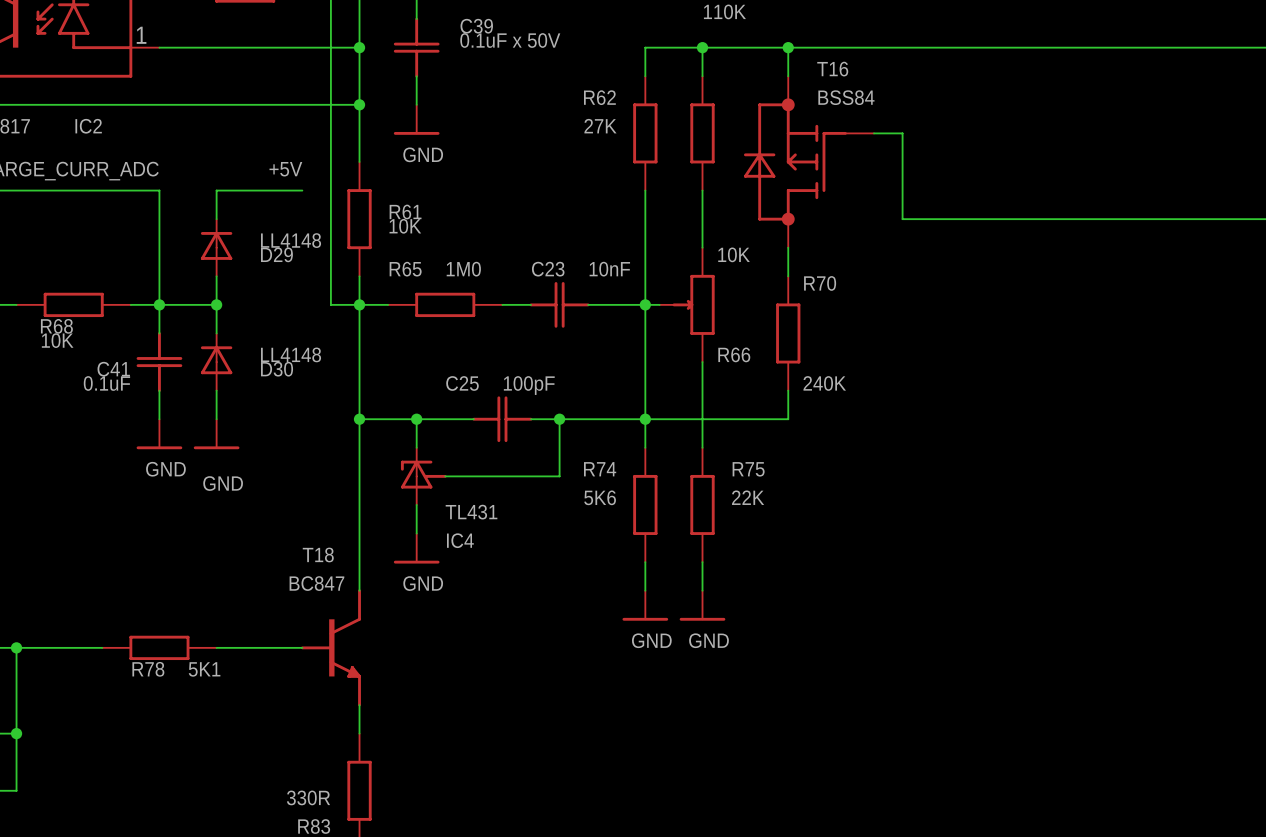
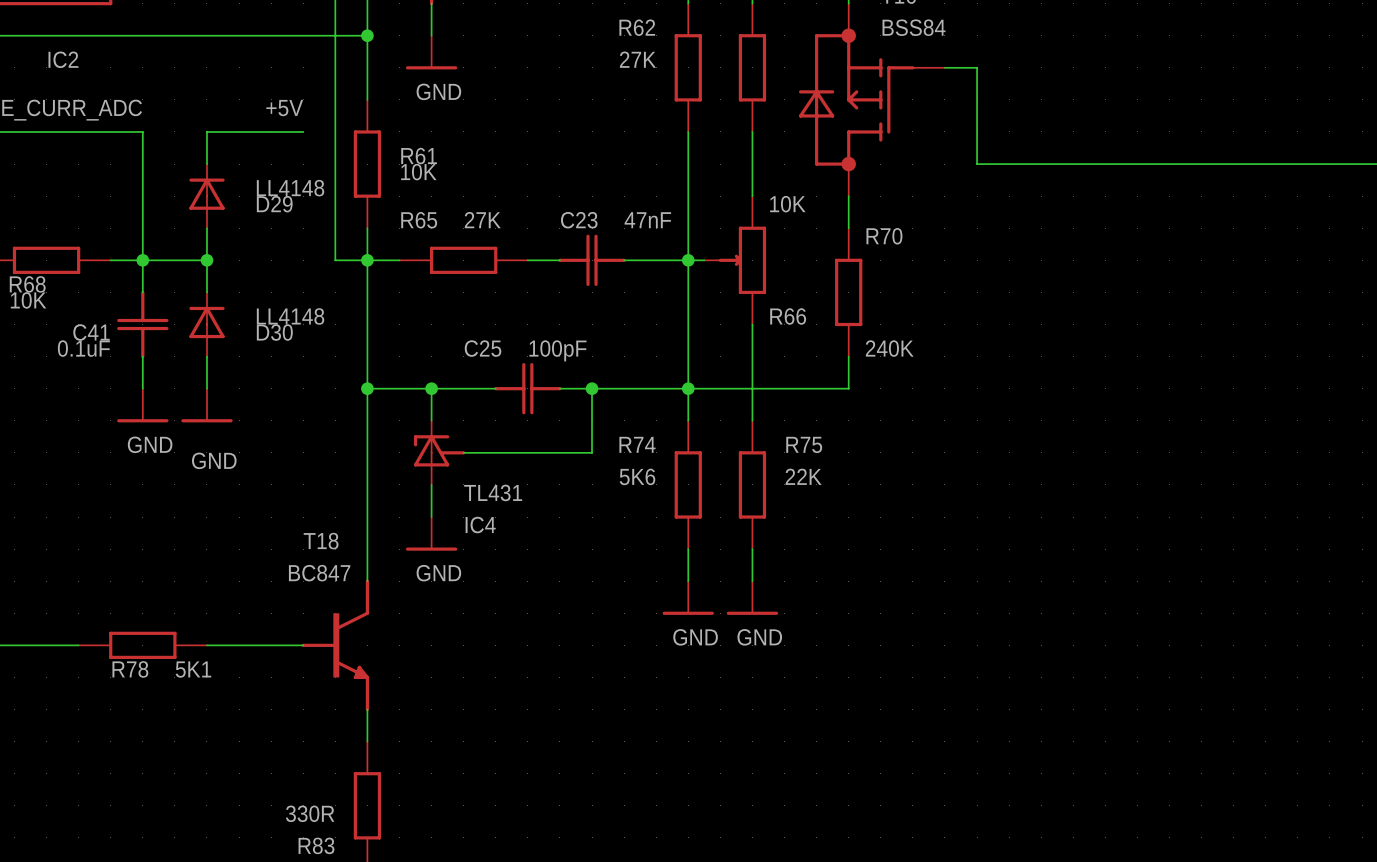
R65 value: 1M0 (463, 269) -> 27K (482, 220)
C23 value: 10nF (609, 269) -> 47nF (647, 220)

